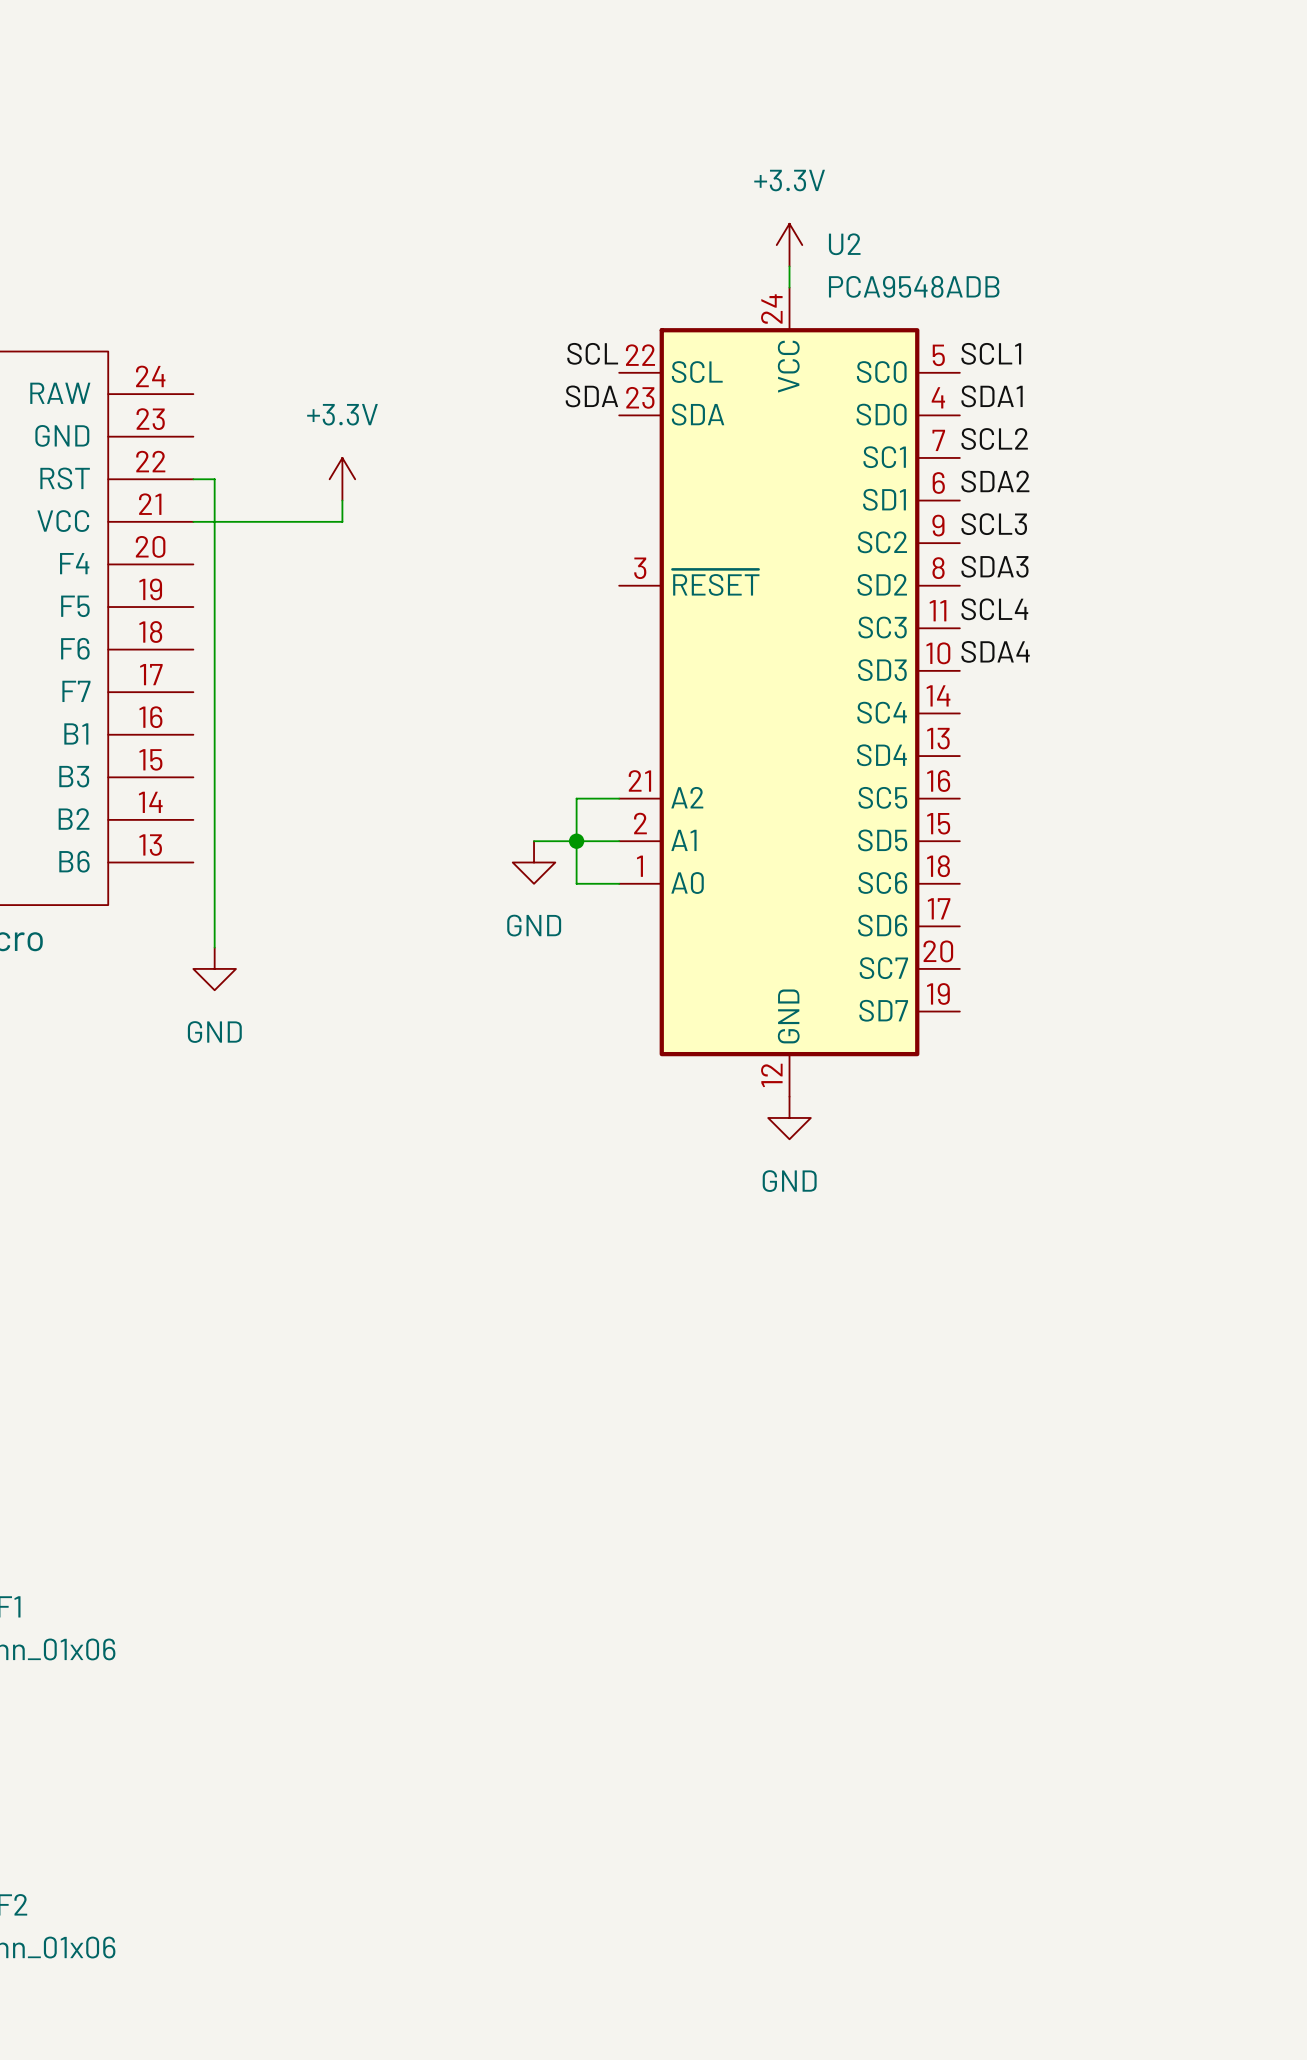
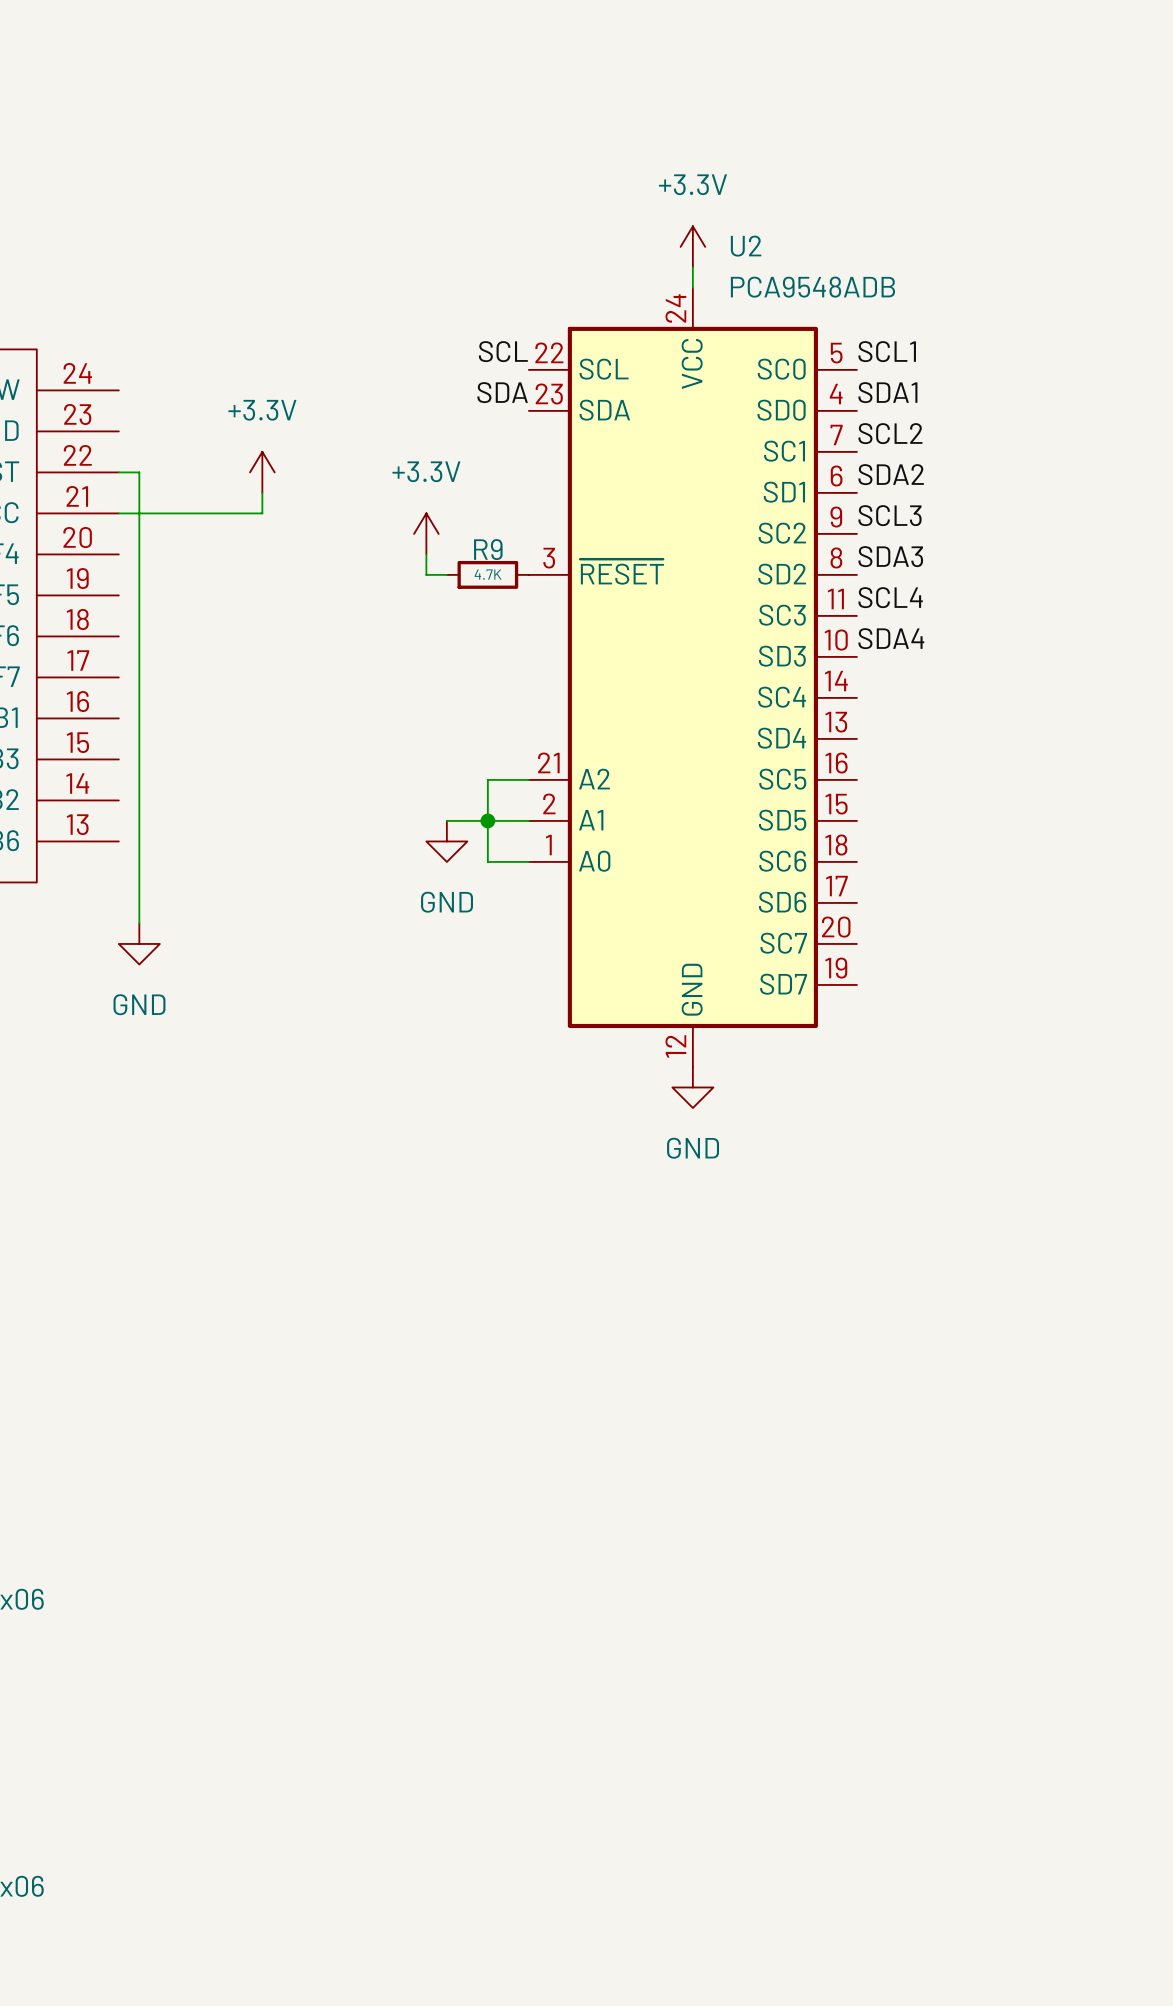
power symbol: none -> +3.3V (426, 533)
wire: none -> (426, 554) (426, 574) (446, 574)
R9: none -> 4.7K (487, 574)

